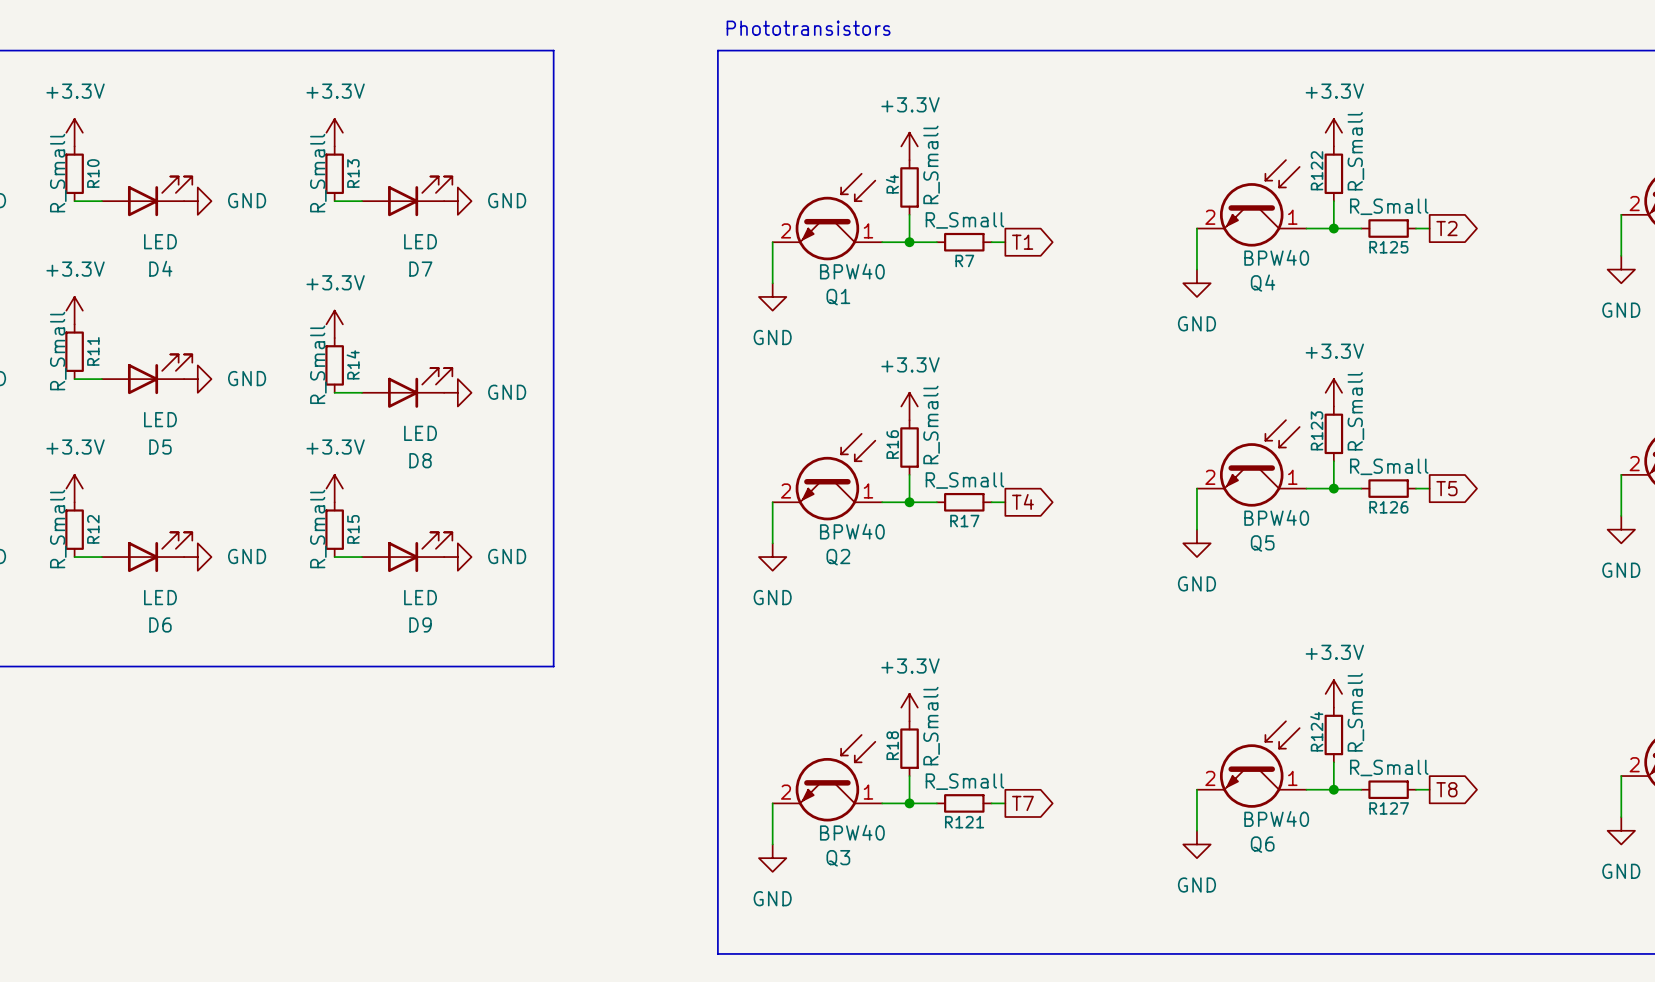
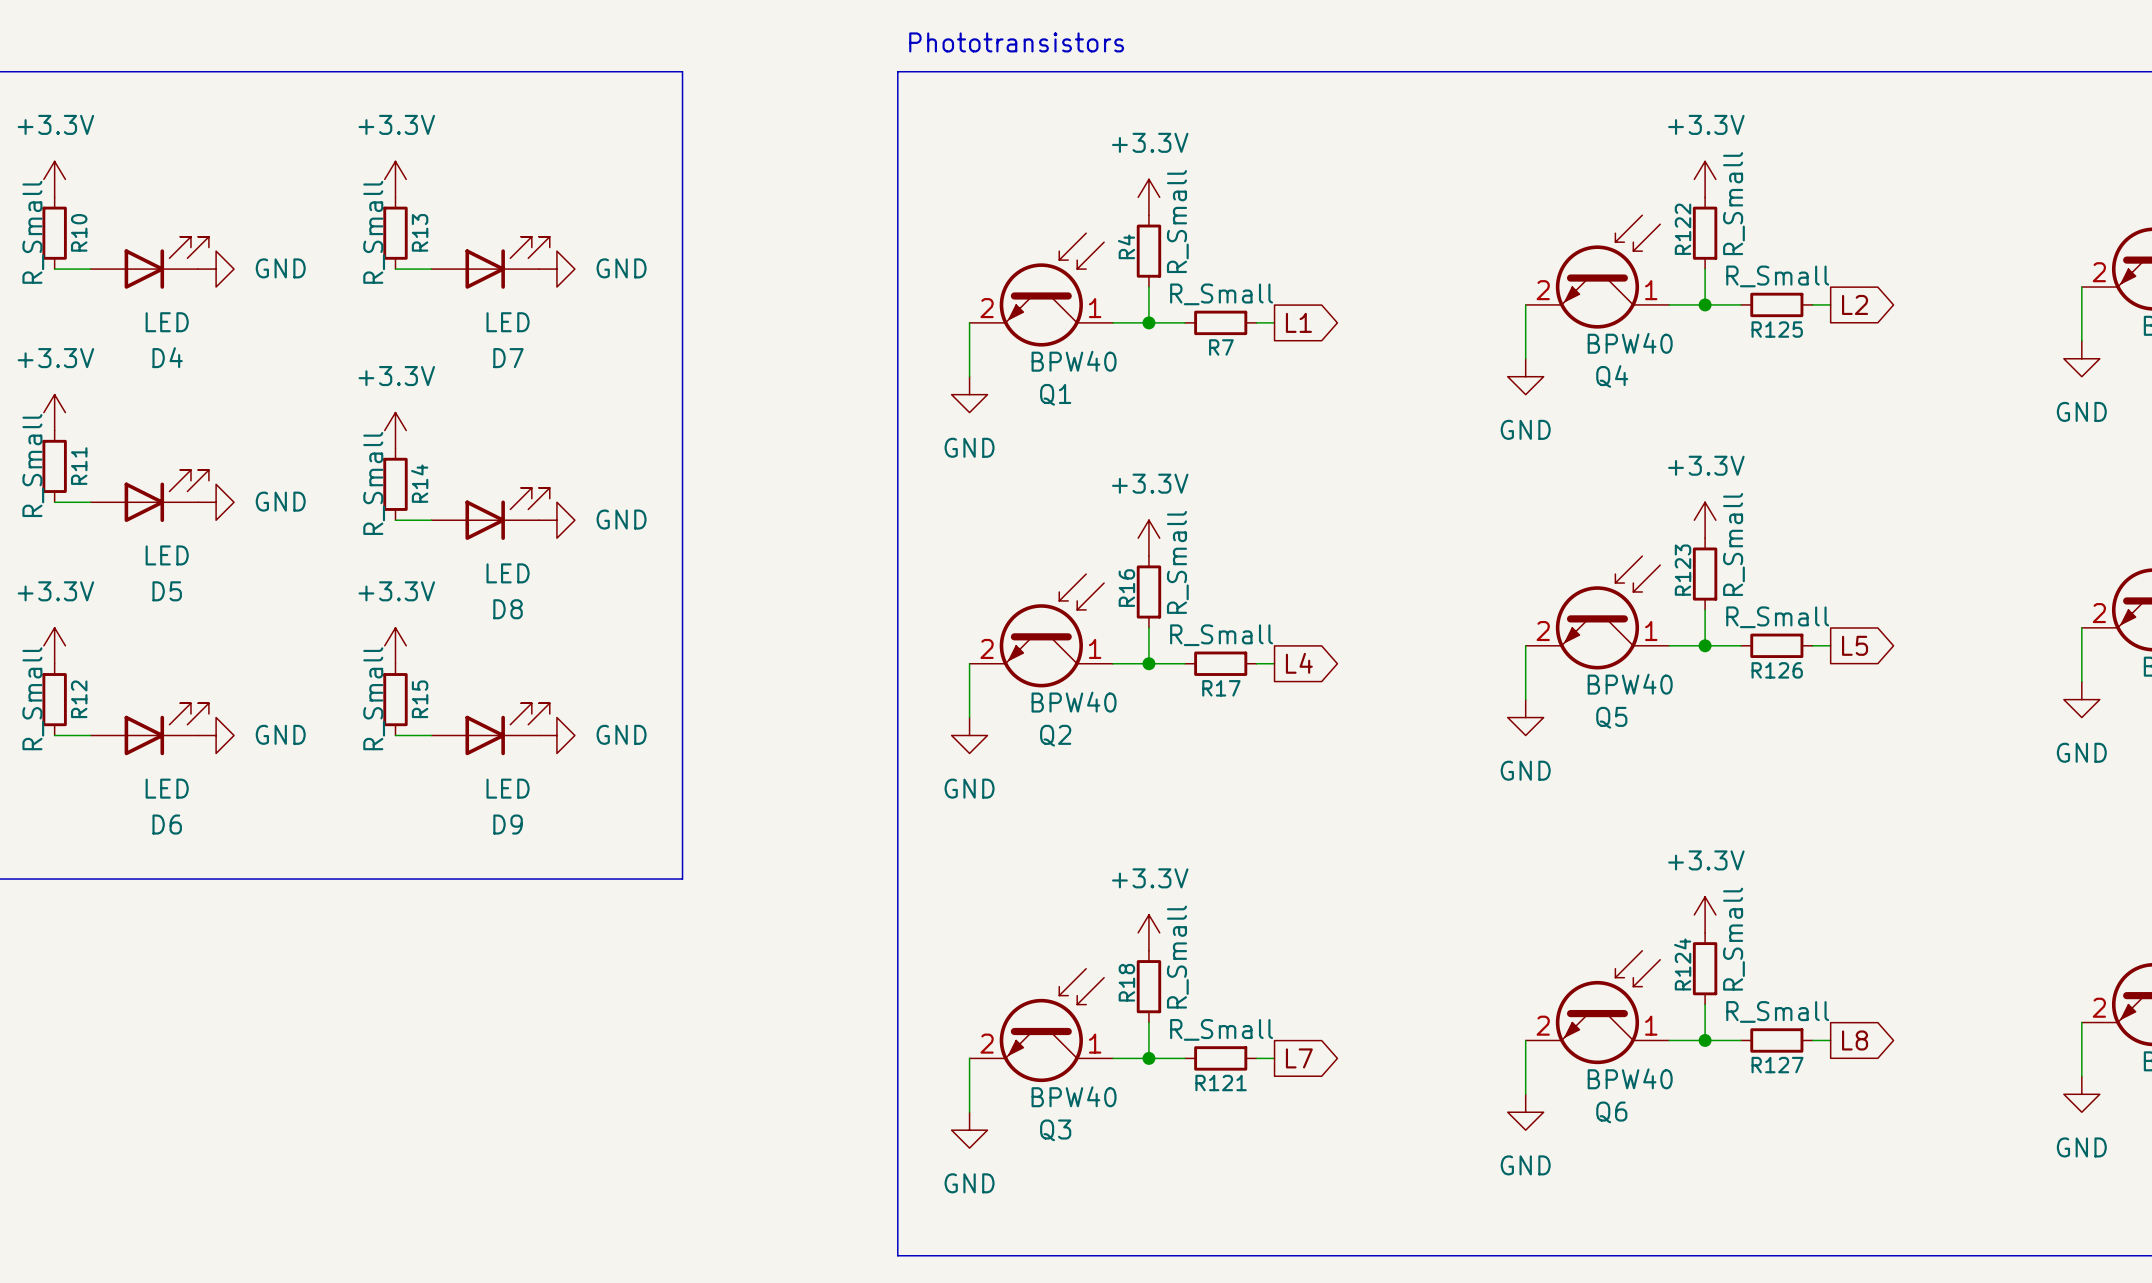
global label: T2 (1446, 228) -> L2 (1855, 304)
global label: T1 (1022, 242) -> L1 (1298, 322)
global label: T5 (1446, 488) -> L5 (1855, 645)
global label: T4 (1022, 501) -> L4 (1299, 663)
global label: T8 (1446, 789) -> L8 (1855, 1040)
global label: T7 (1022, 803) -> L7 (1299, 1058)

